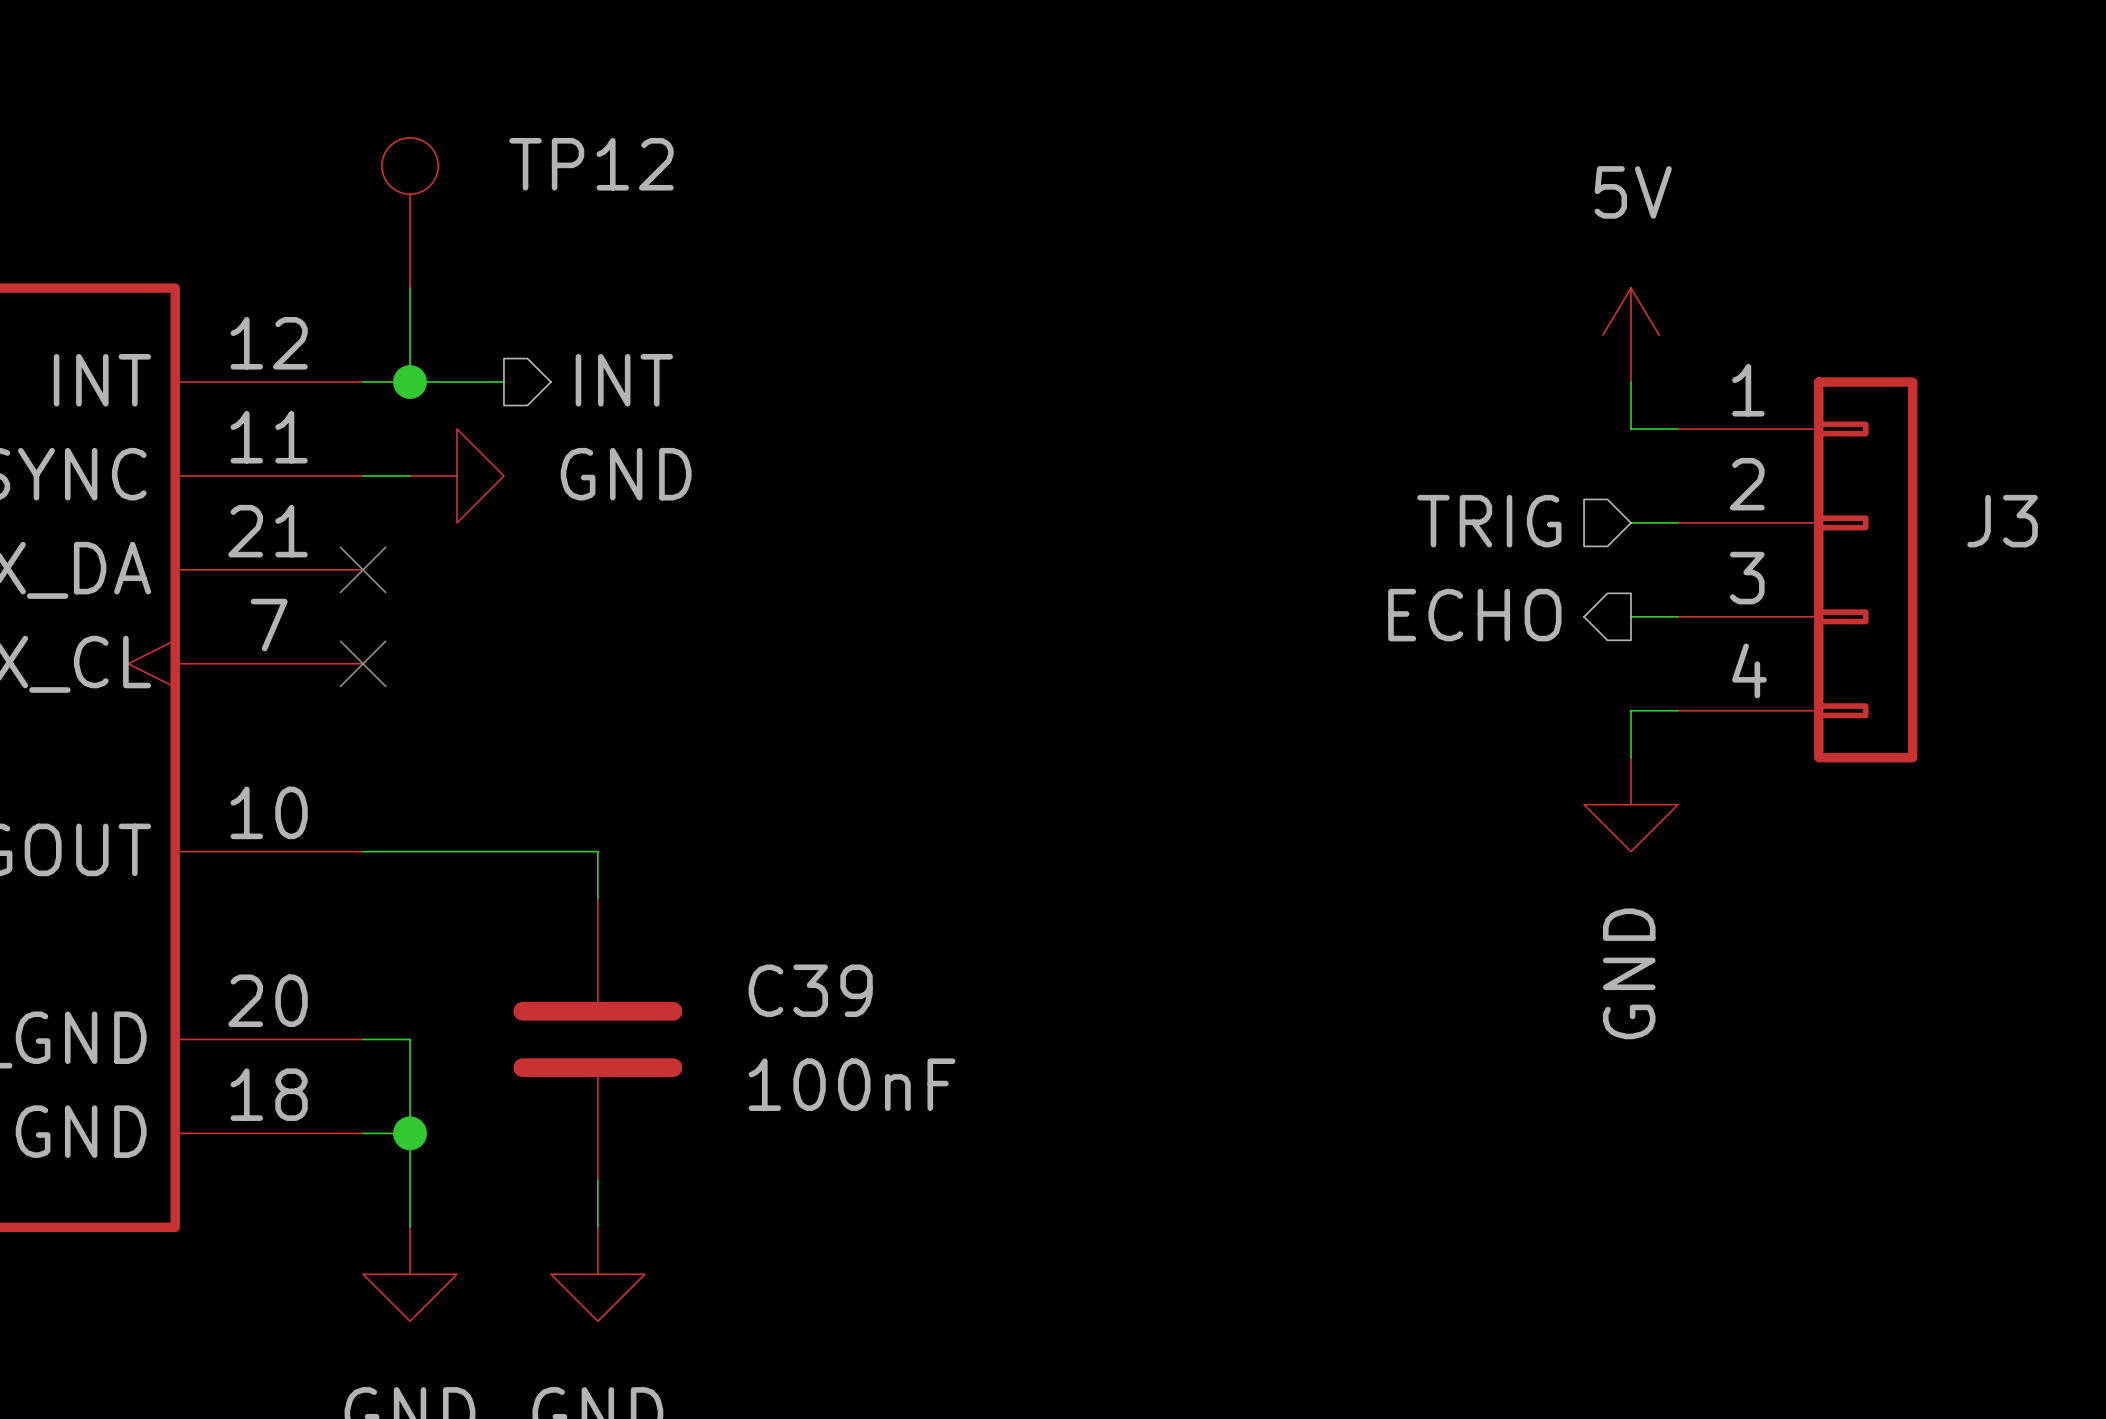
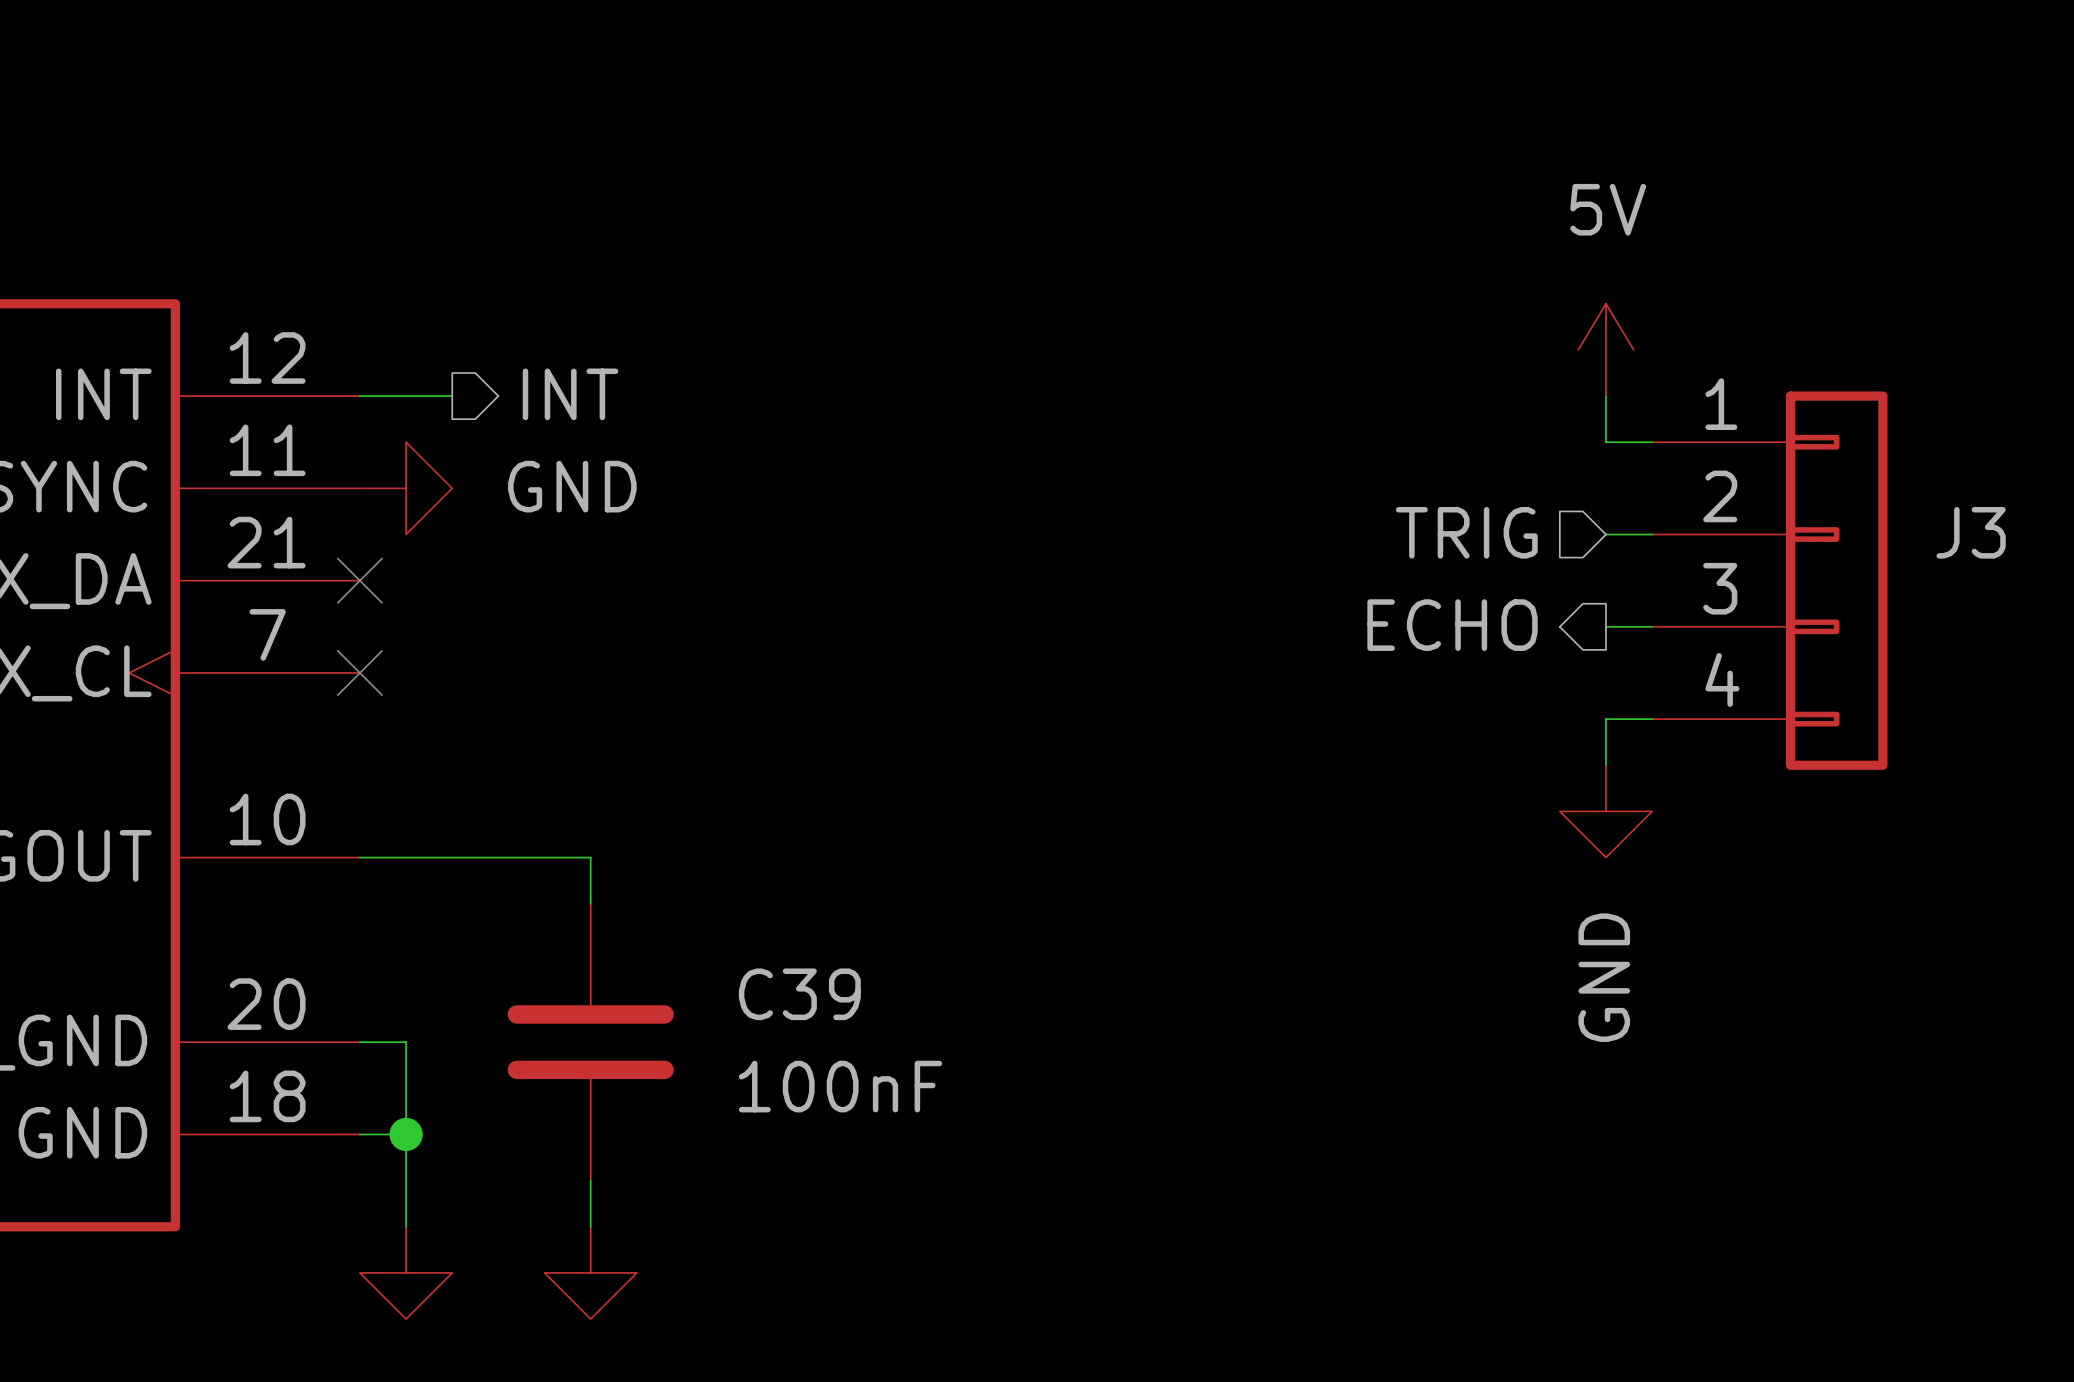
TP12: (410, 212) -> none
wire: (410, 288) (410, 382) -> none
hierarchical label position: INT (624, 380) -> INT (570, 394)
junction: (410, 382) -> none
wire: (456, 382) (503, 382) -> none
power symbol position: GND (456, 475) -> GND (406, 488)

